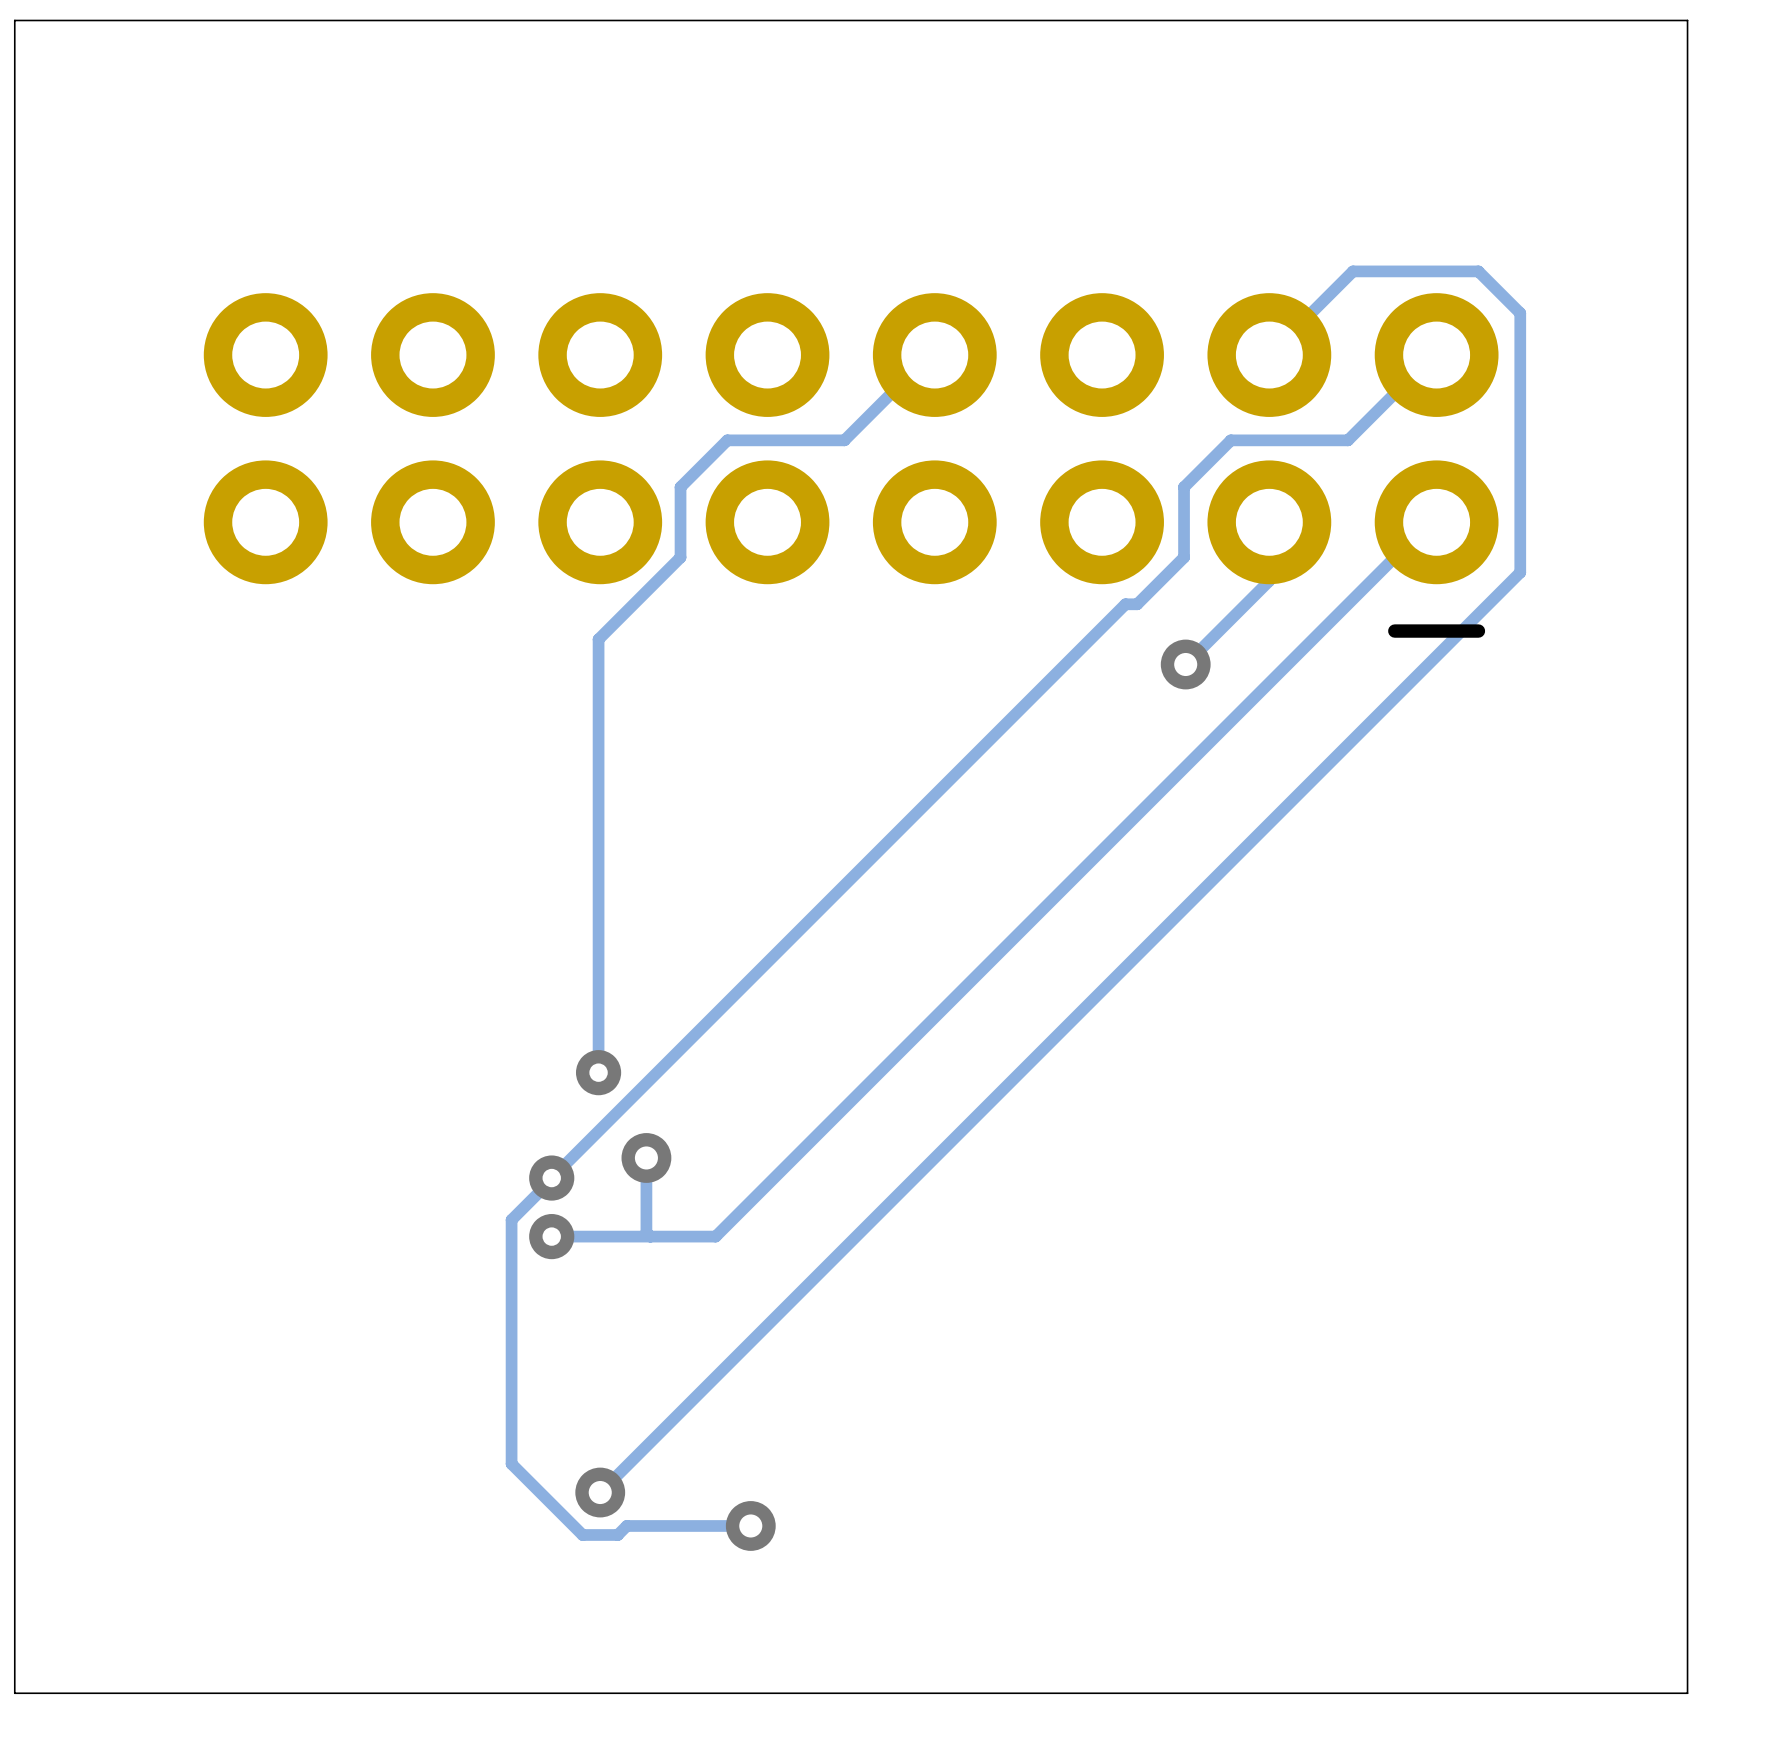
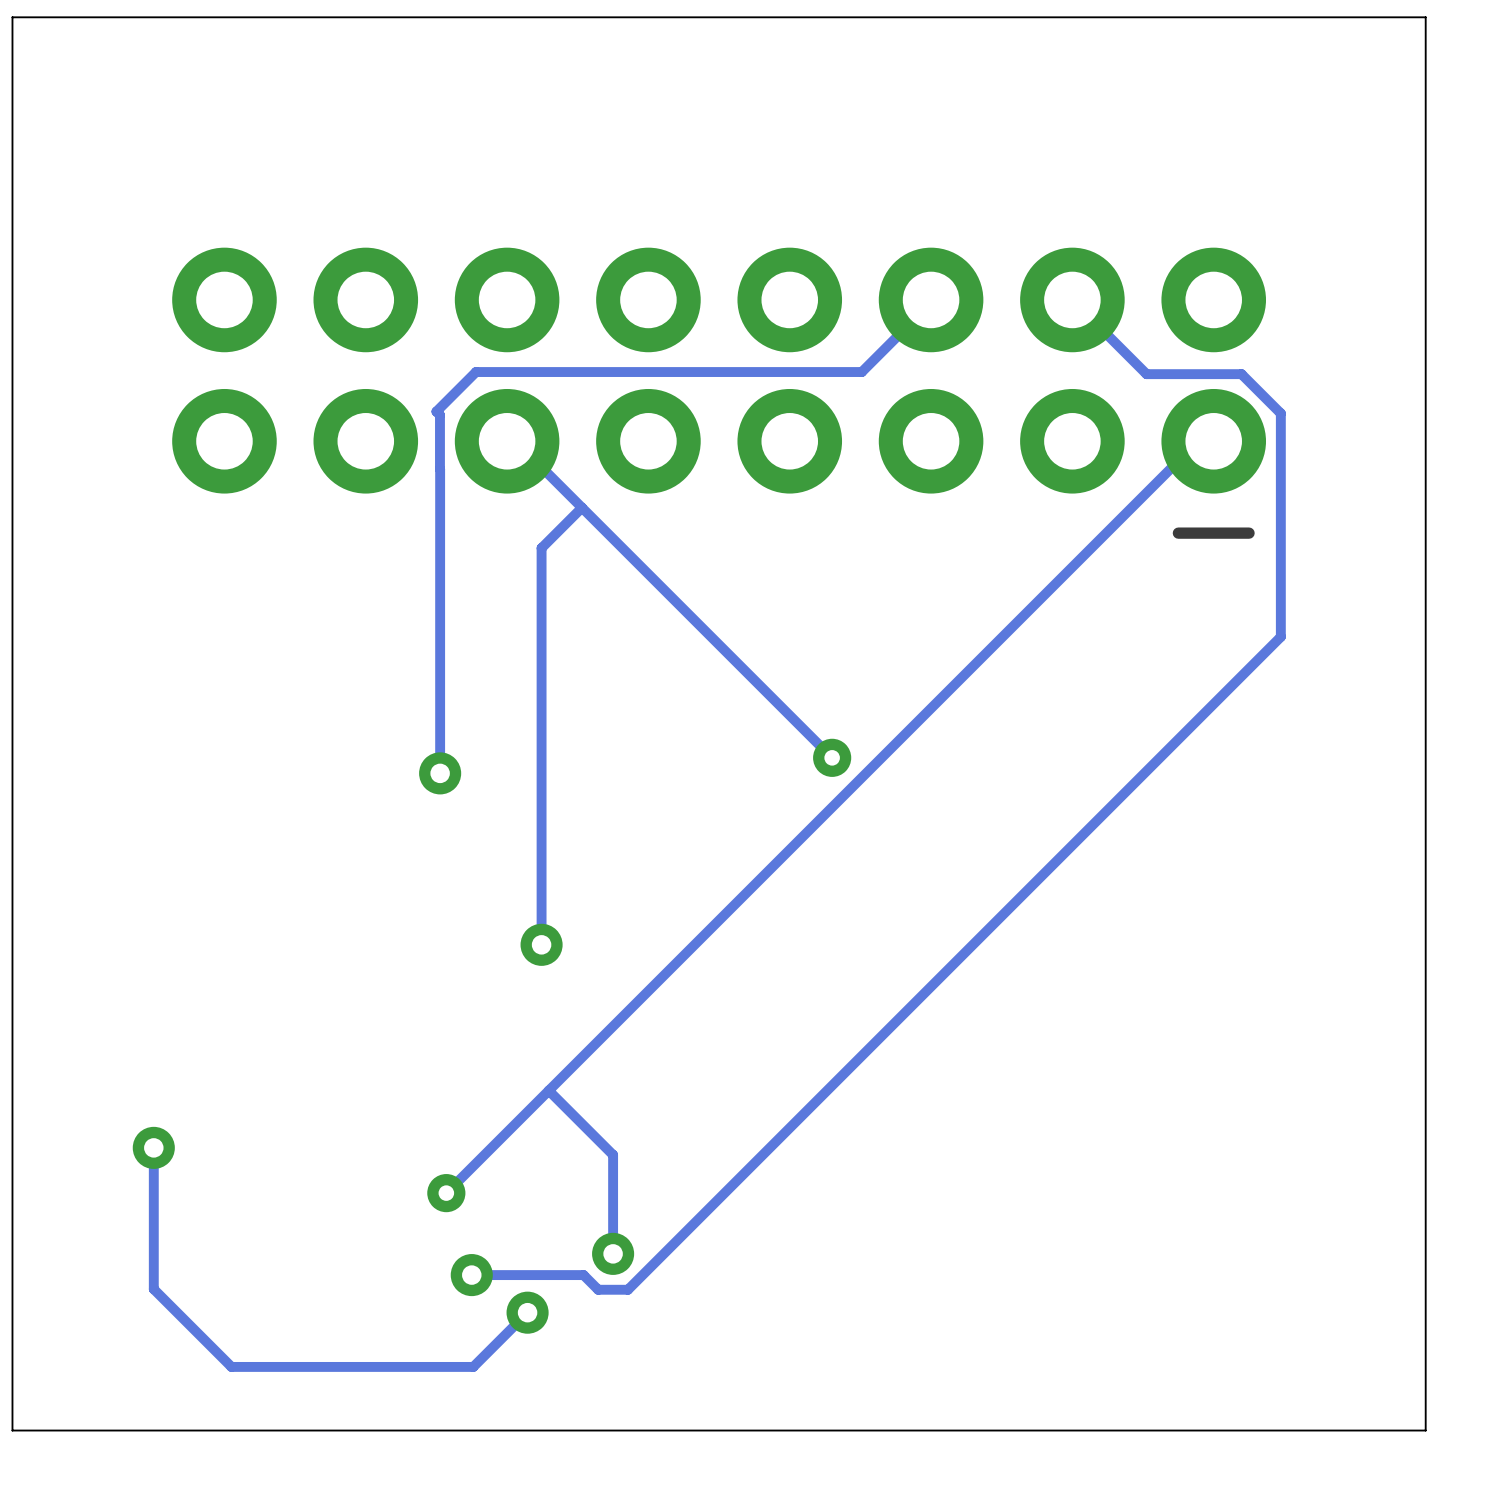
track: (934, 355) (926, 358) (844, 440) -> (931, 299) (931, 302) (861, 372) (713, 372)
track: (1269, 355) (1352, 271) (1478, 271) (1520, 313) (1520, 572) (600, 1492) -> (1072, 299) (1146, 374) (1241, 374) (1280, 413) (1280, 636) (627, 1289) (598, 1289) (583, 1275) (471, 1275)
track: (1436, 355) (1429, 358) (1347, 440) (1230, 440) (1184, 487) (1184, 557) (1137, 604) (1125, 604) (511, 1219) (511, 1463) (582, 1534) (617, 1534) (626, 1525) (750, 1525) -> none
track: (727, 440) (680, 487) (680, 557) (598, 639) (598, 1072) -> (614, 372) (476, 372) (436, 411) (439, 415) (439, 469)
track: none -> (507, 441) (515, 441) (832, 757)
track: (1269, 522) (1269, 580) (1185, 664) -> none
track: (1429, 522) (715, 1236) (551, 1236) -> (1208, 441) (1198, 441) (446, 1193)
track: none -> (440, 469) (440, 773)
track: none -> (582, 507) (541, 548) (541, 944)
via: (1185, 664) -> none
via: none -> (832, 757)
via: none -> (440, 773)
via: (598, 1072) -> none
track: (646, 1157) (646, 1232) (650, 1236) -> none
via position: (646, 1157) -> (541, 944)
via: (551, 1178) -> none
via: (551, 1236) -> none
track: none -> (548, 1090) (613, 1154) (613, 1253)
track: none -> (153, 1147) (153, 1289) (231, 1366) (473, 1366) (527, 1312)
via: none -> (153, 1147)
via: none -> (446, 1193)
via position: (600, 1492) -> (471, 1275)
via position: (750, 1525) -> (613, 1253)
via: none -> (527, 1312)

